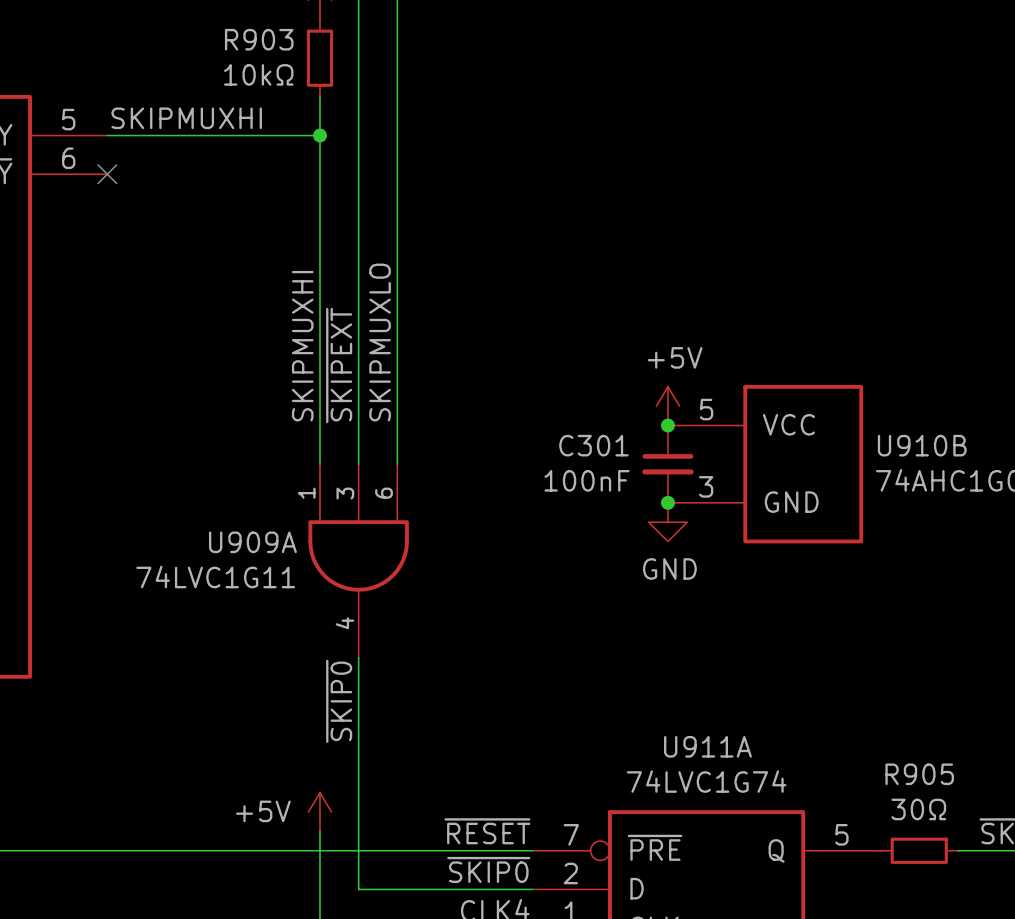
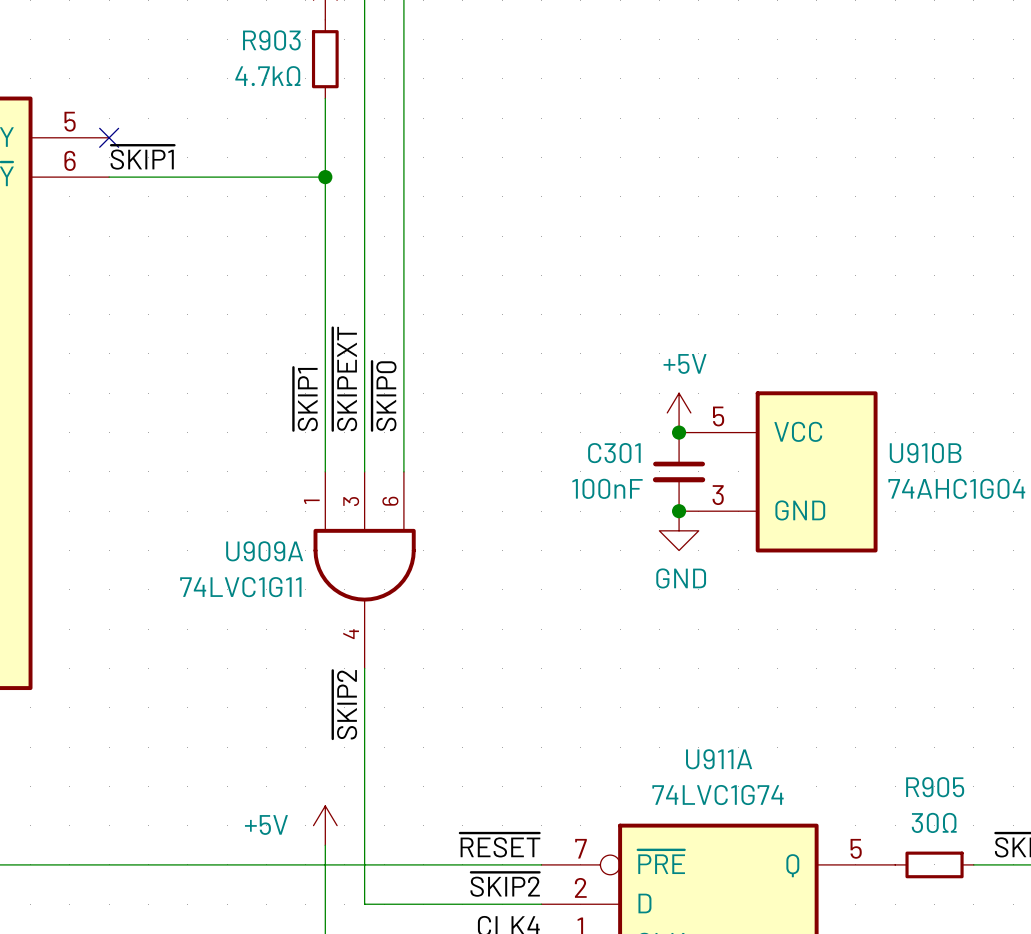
R903 value: 10kΩ (258, 74) -> 4.7kΩ (267, 76)
label: SKIPMUXHI (186, 118) -> none
wire: (107, 135) (319, 135) -> (109, 177) (325, 177)
junction position: (319, 135) -> (325, 177)
label: none -> ~{SKIP1} (142, 157)
no-connect mark position: (107, 174) -> (109, 137)
label: SKIPMUXLO (380, 342) -> ~{SKIP0} (384, 396)
label: SKIPMUXHI (302, 346) -> ~{SKIP1} (305, 399)
label: ~{SKIP0} (339, 701) -> ~{SKIP2} (344, 704)
label: ~{SKIP0} (488, 869) -> ~{SKIP2} (505, 884)

